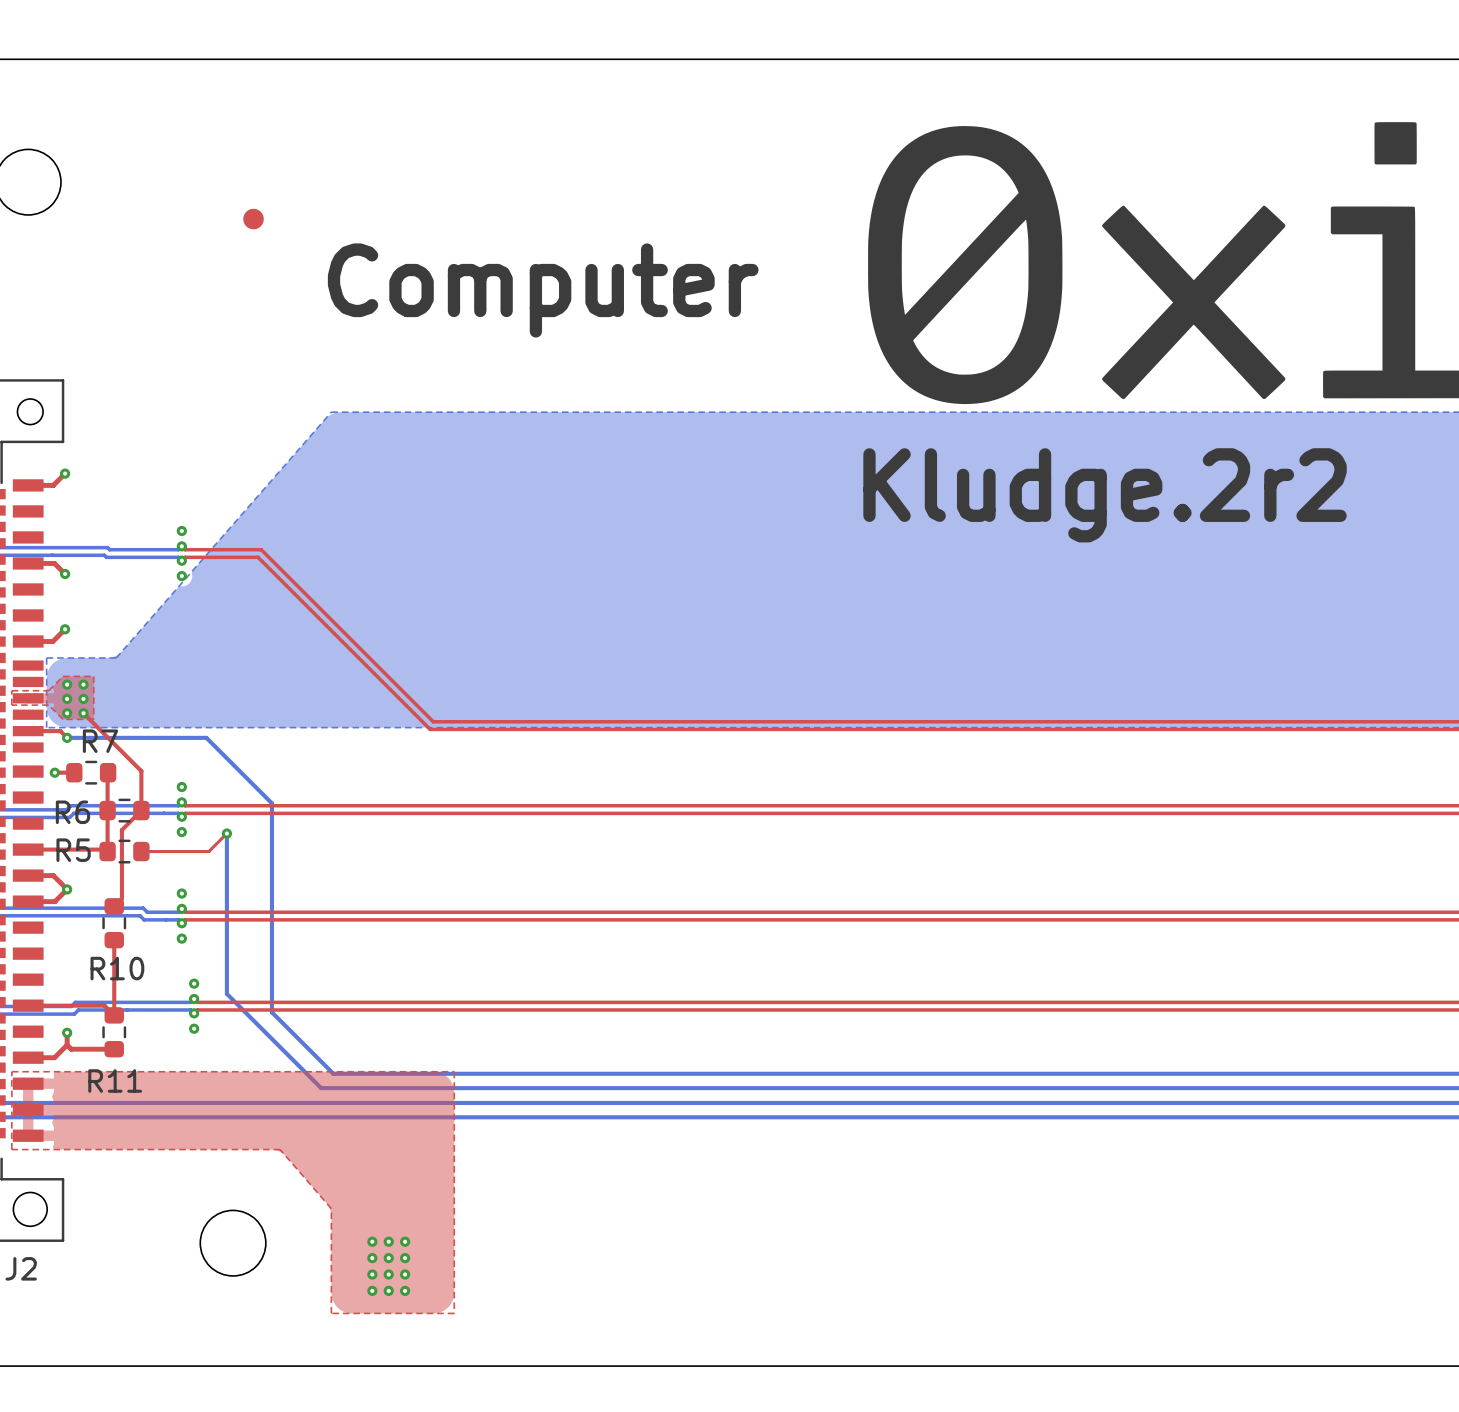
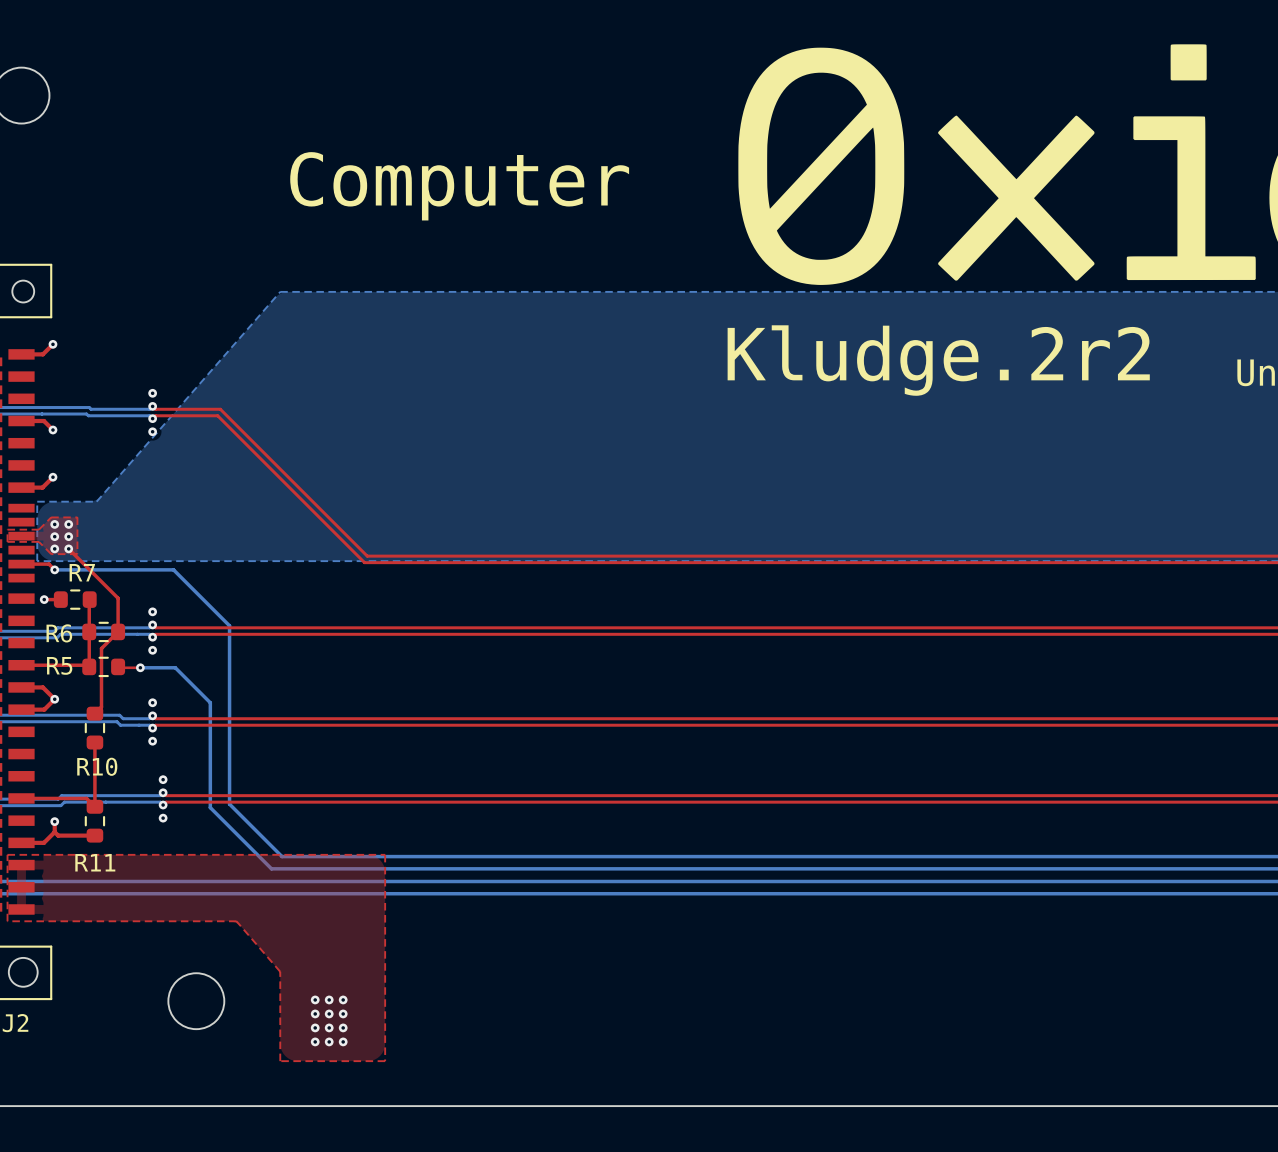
part: (253, 219) -> none
top track: (226, 833) (208, 851) (141, 851) -> (140, 667) (118, 666)
bottom track: (226, 833) (226, 993) (249, 1016) -> (140, 667) (175, 667) (210, 702) (210, 807)
via position: (226, 833) -> (140, 667)

